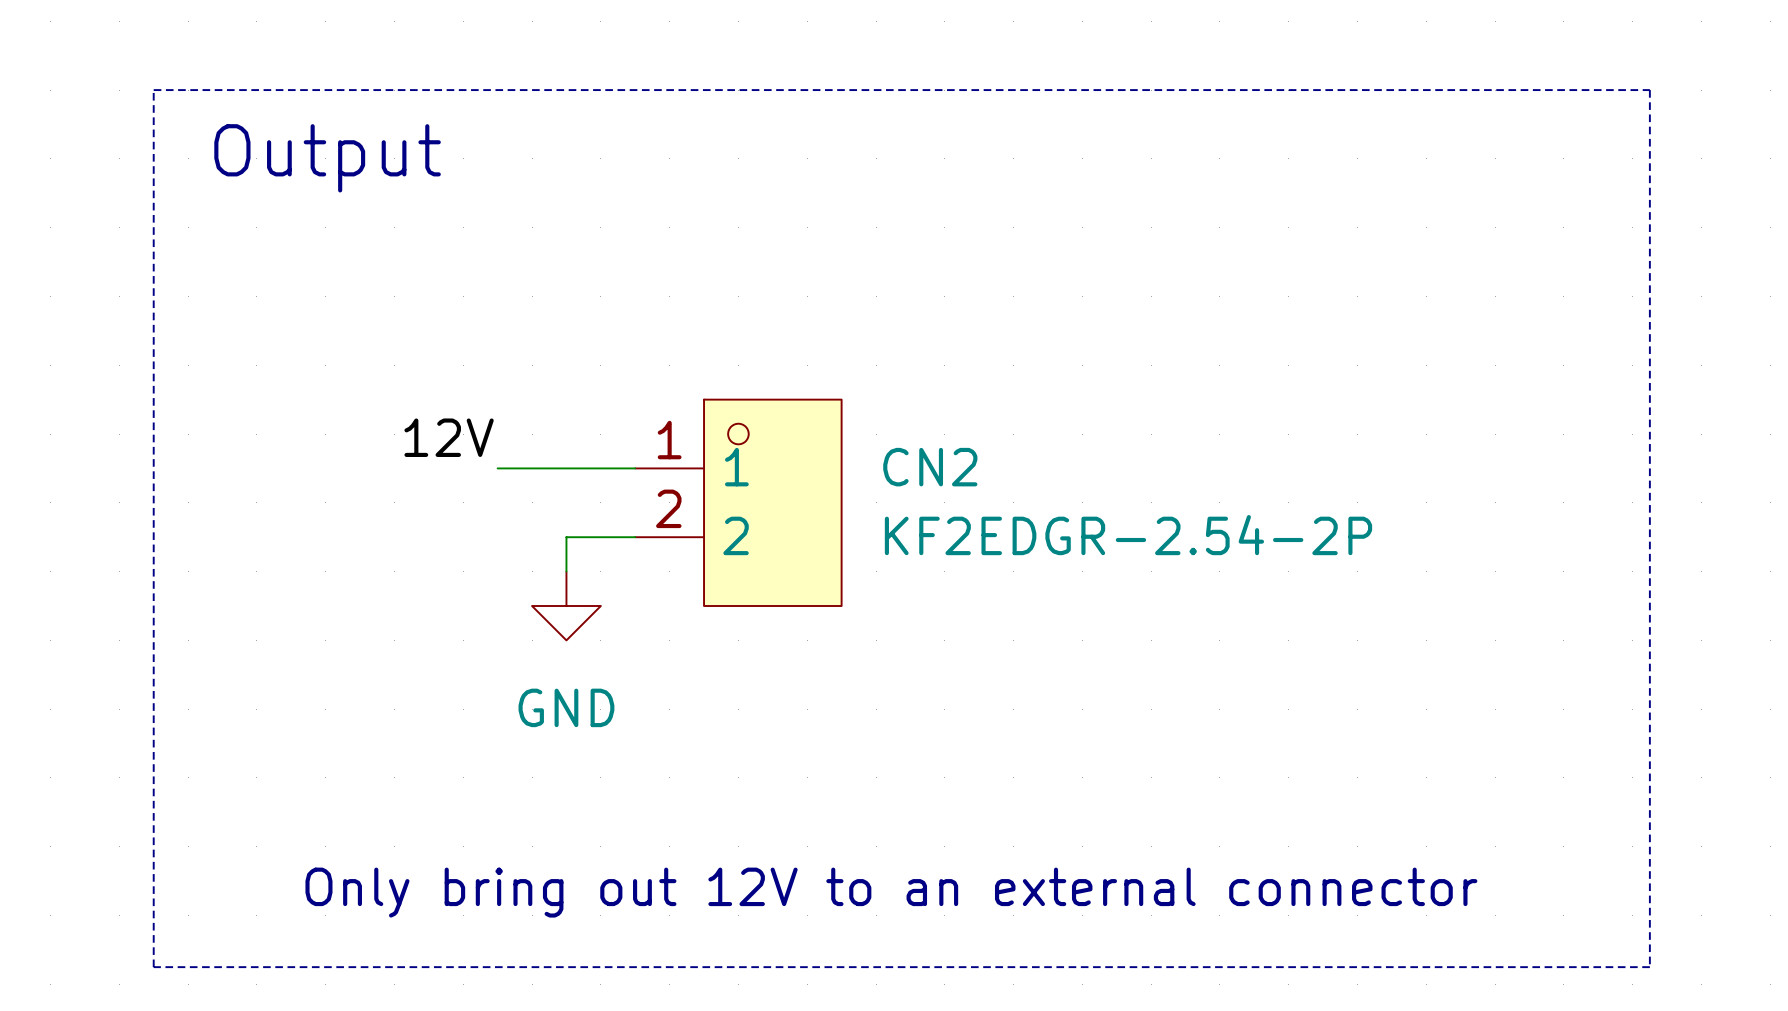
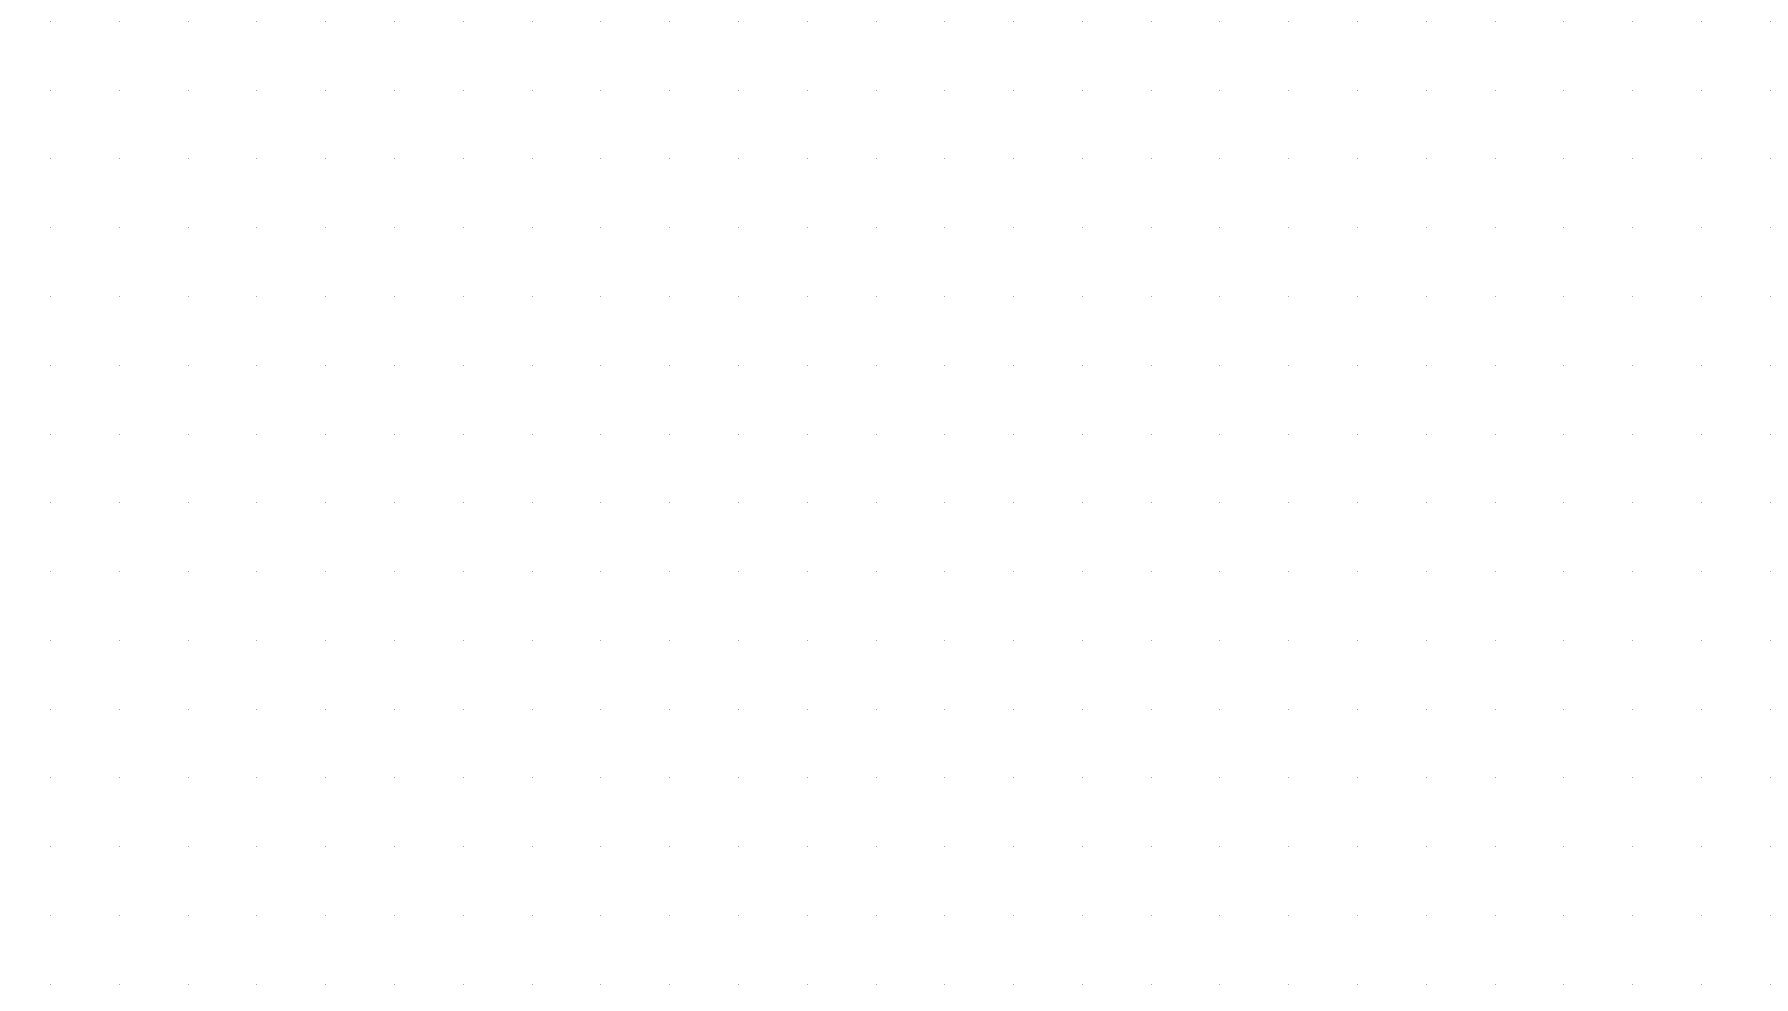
line: (153, 90) (1649, 90) (1649, 967) (153, 967) (153, 90) -> none
text: Output (327, 158) -> none
label: 12V (449, 437) -> none
wire: (497, 468) (635, 468) -> none
CN2: KF2EDGR-2.54-2P (738, 502) -> none
wire: (635, 537) (566, 537) (566, 571) -> none
power symbol: GND (566, 605) -> none
text: Only bring out 12V to an external connector (891, 892) -> none

